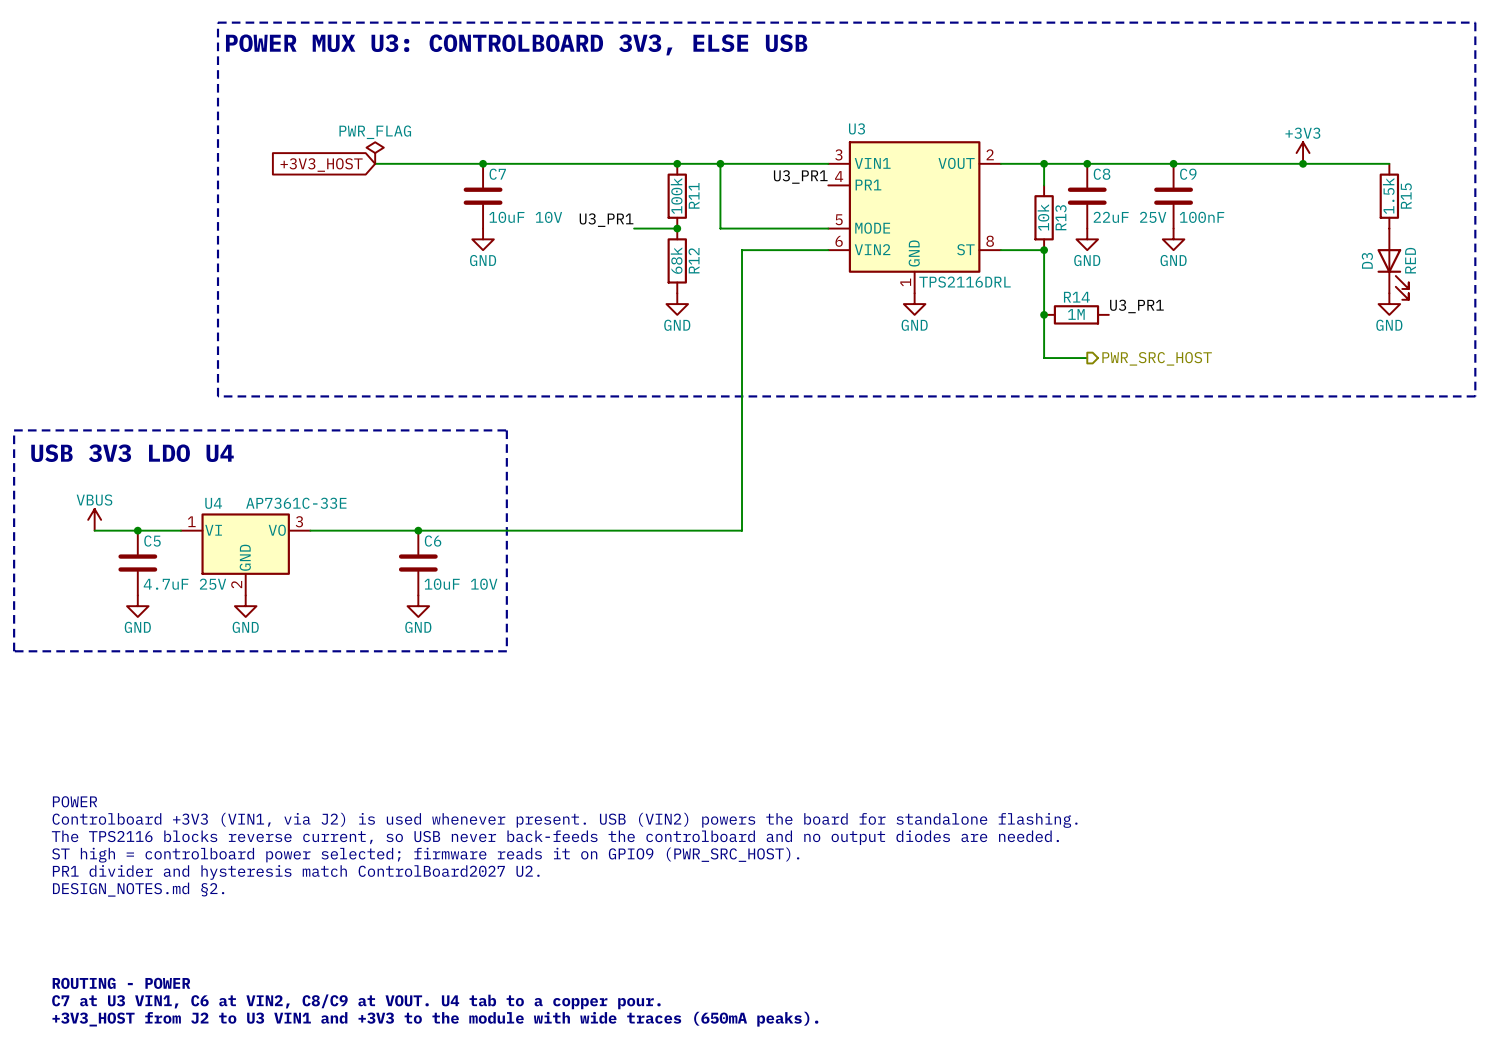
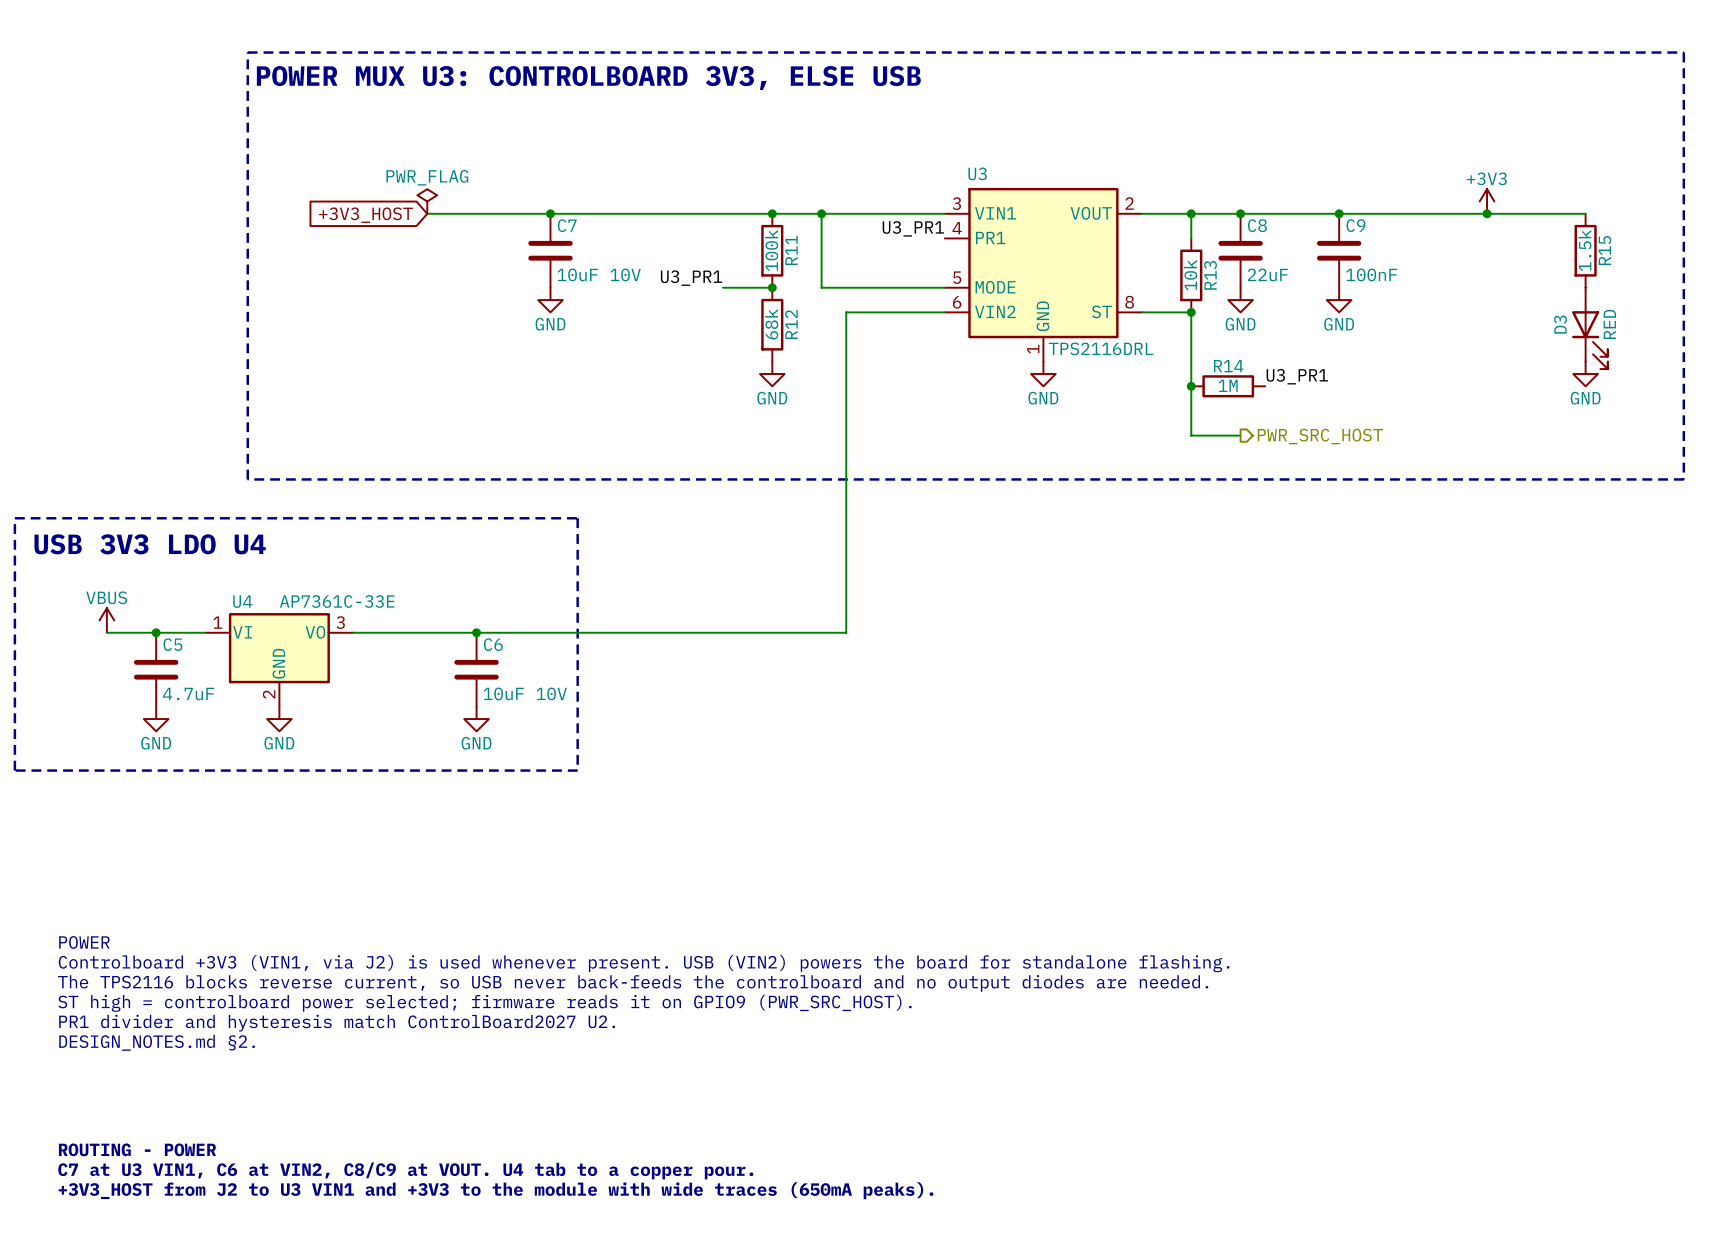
C8 value: 22uF 25V (1129, 217) -> 22uF (1267, 274)
C5 value: 4.7uF 25V (184, 584) -> 4.7uF (188, 694)

